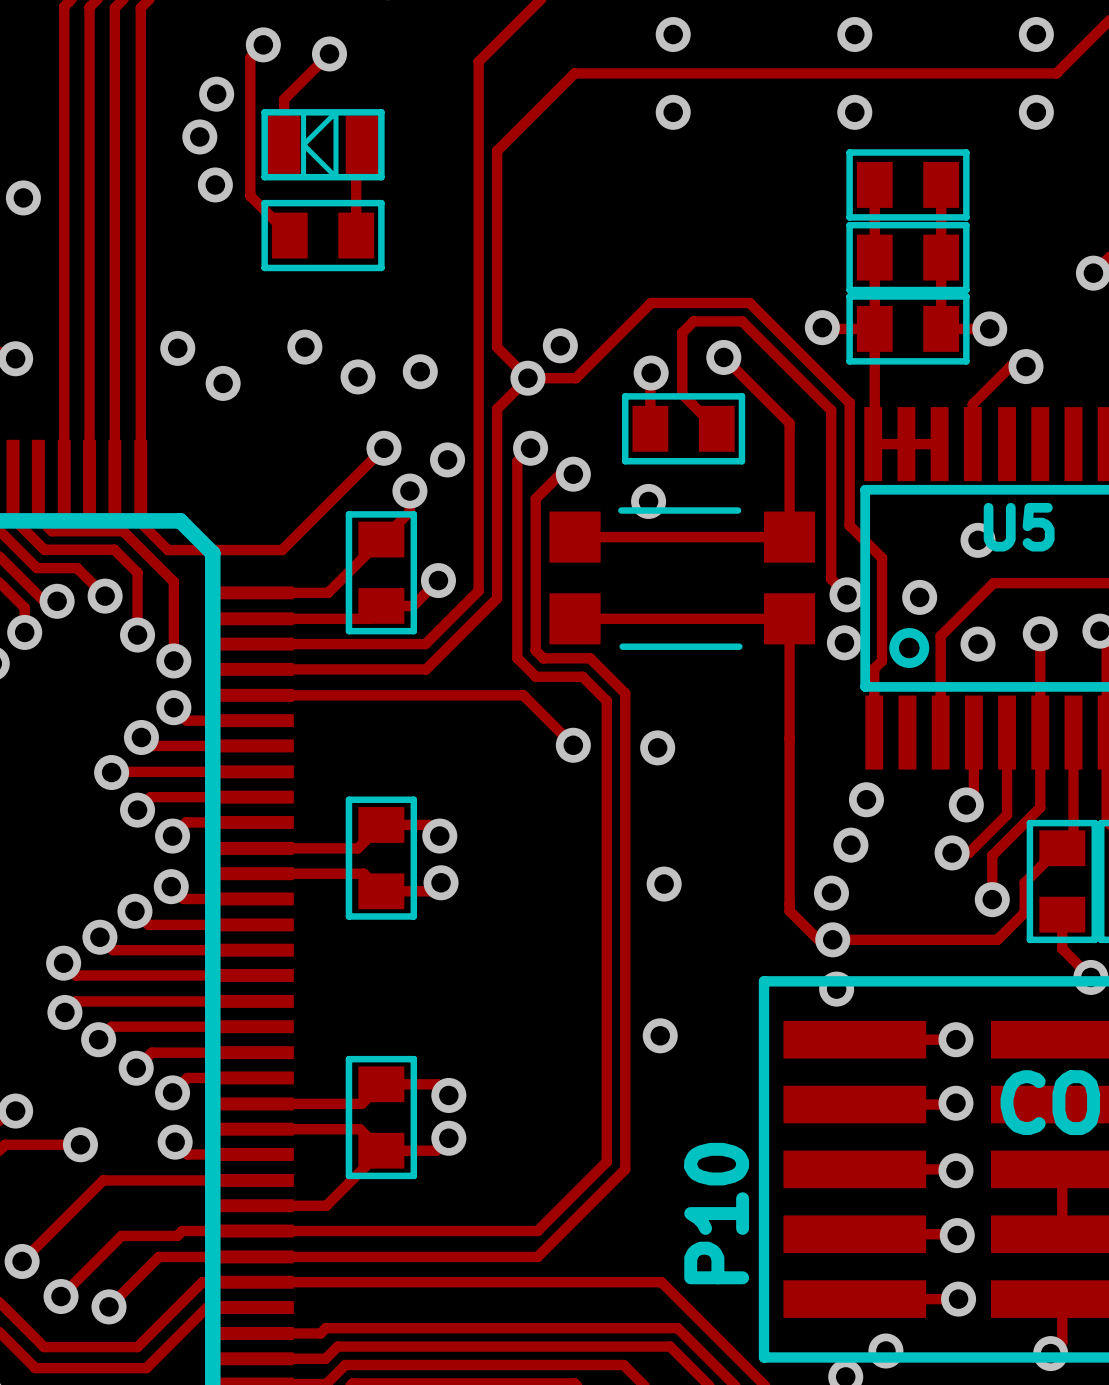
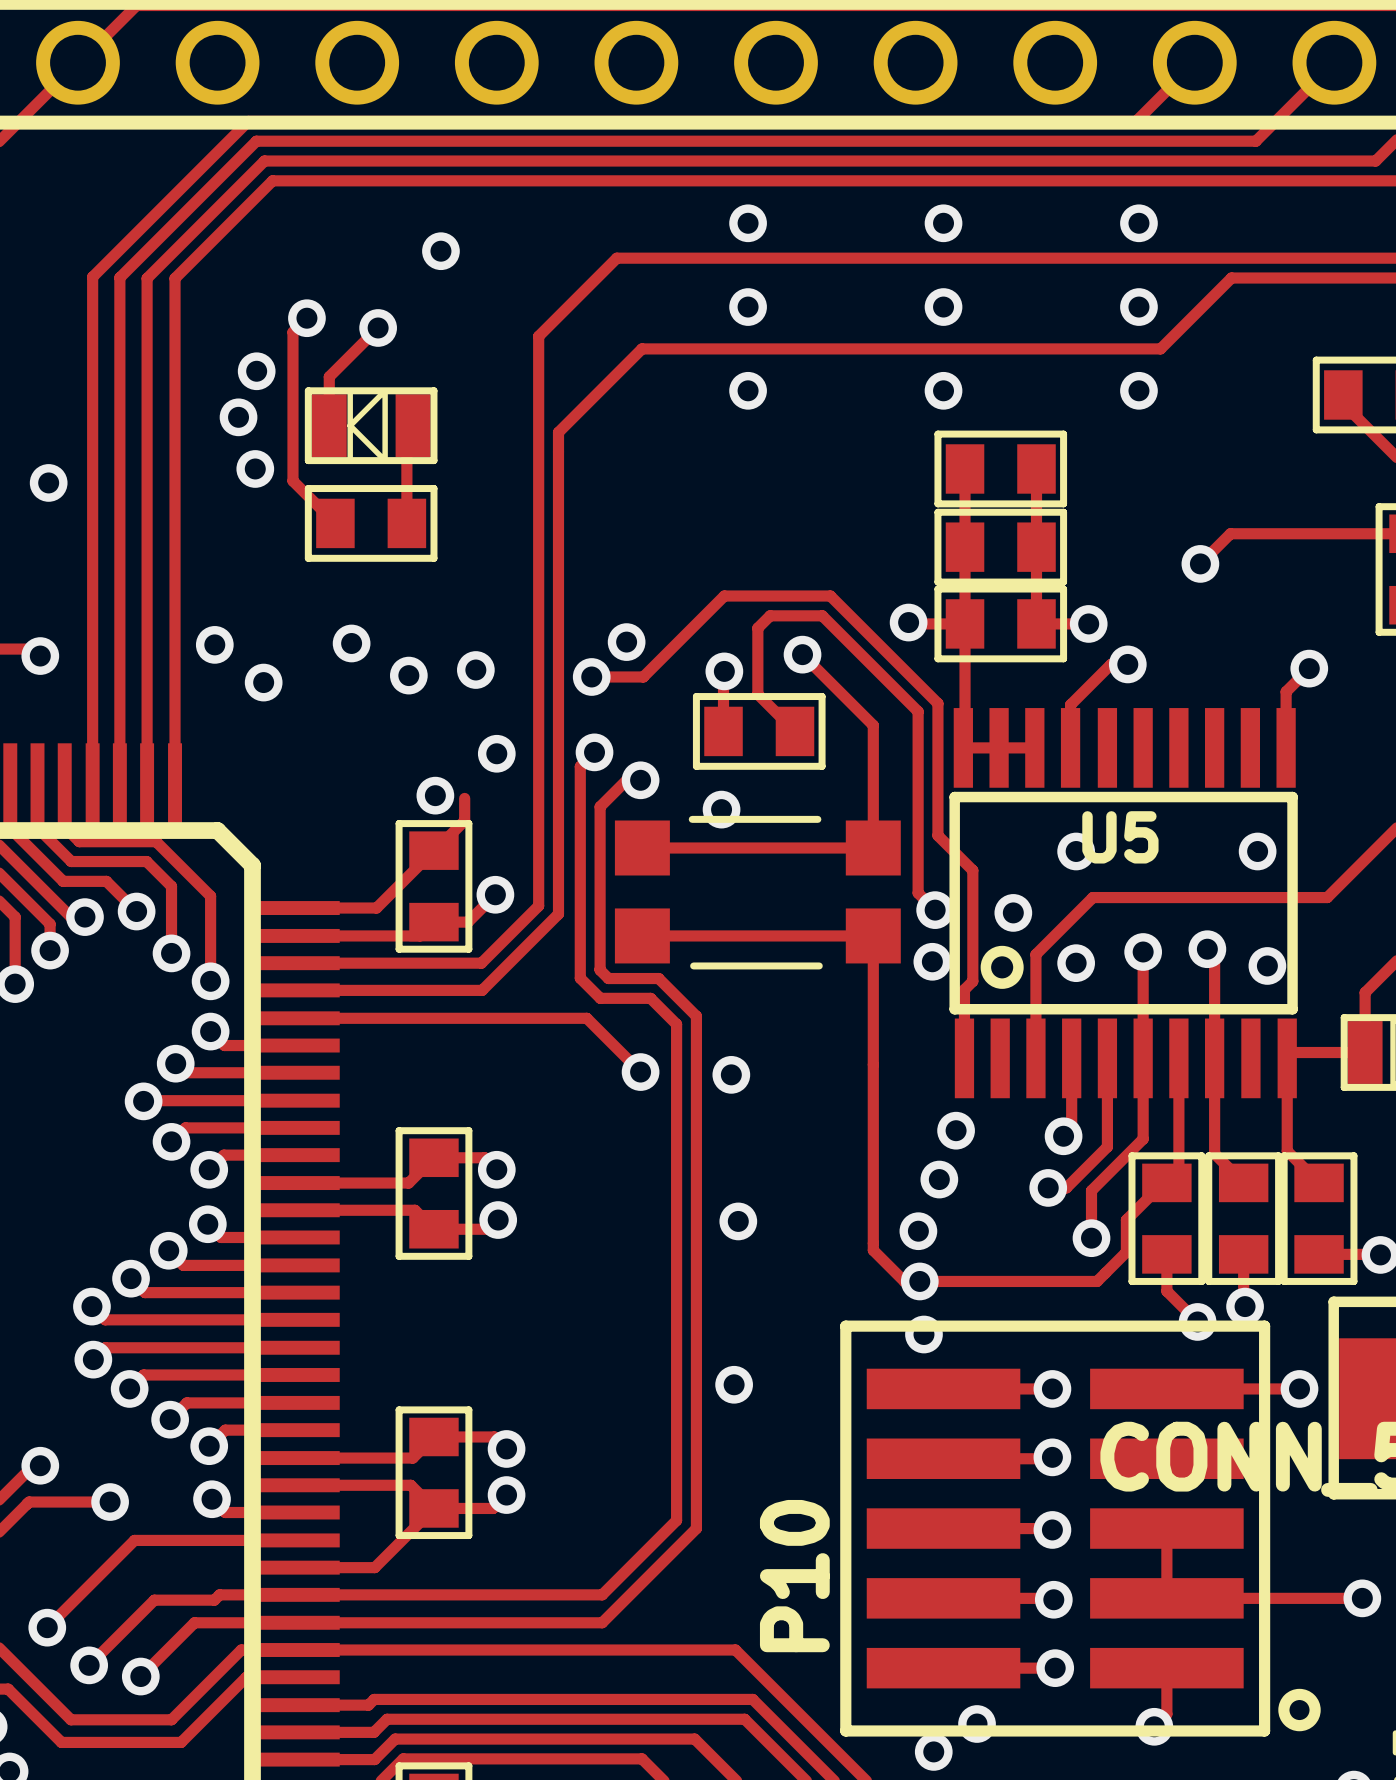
track: (497, 347) (527, 378) (497, 409) -> (558, 643) (558, 710)
track: (383, 448) (282, 550) (168, 550) (140, 522) (140, 478) -> none
via: (383, 448) -> none
via position: (447, 459) -> (496, 753)
via position: (409, 491) -> (435, 795)

